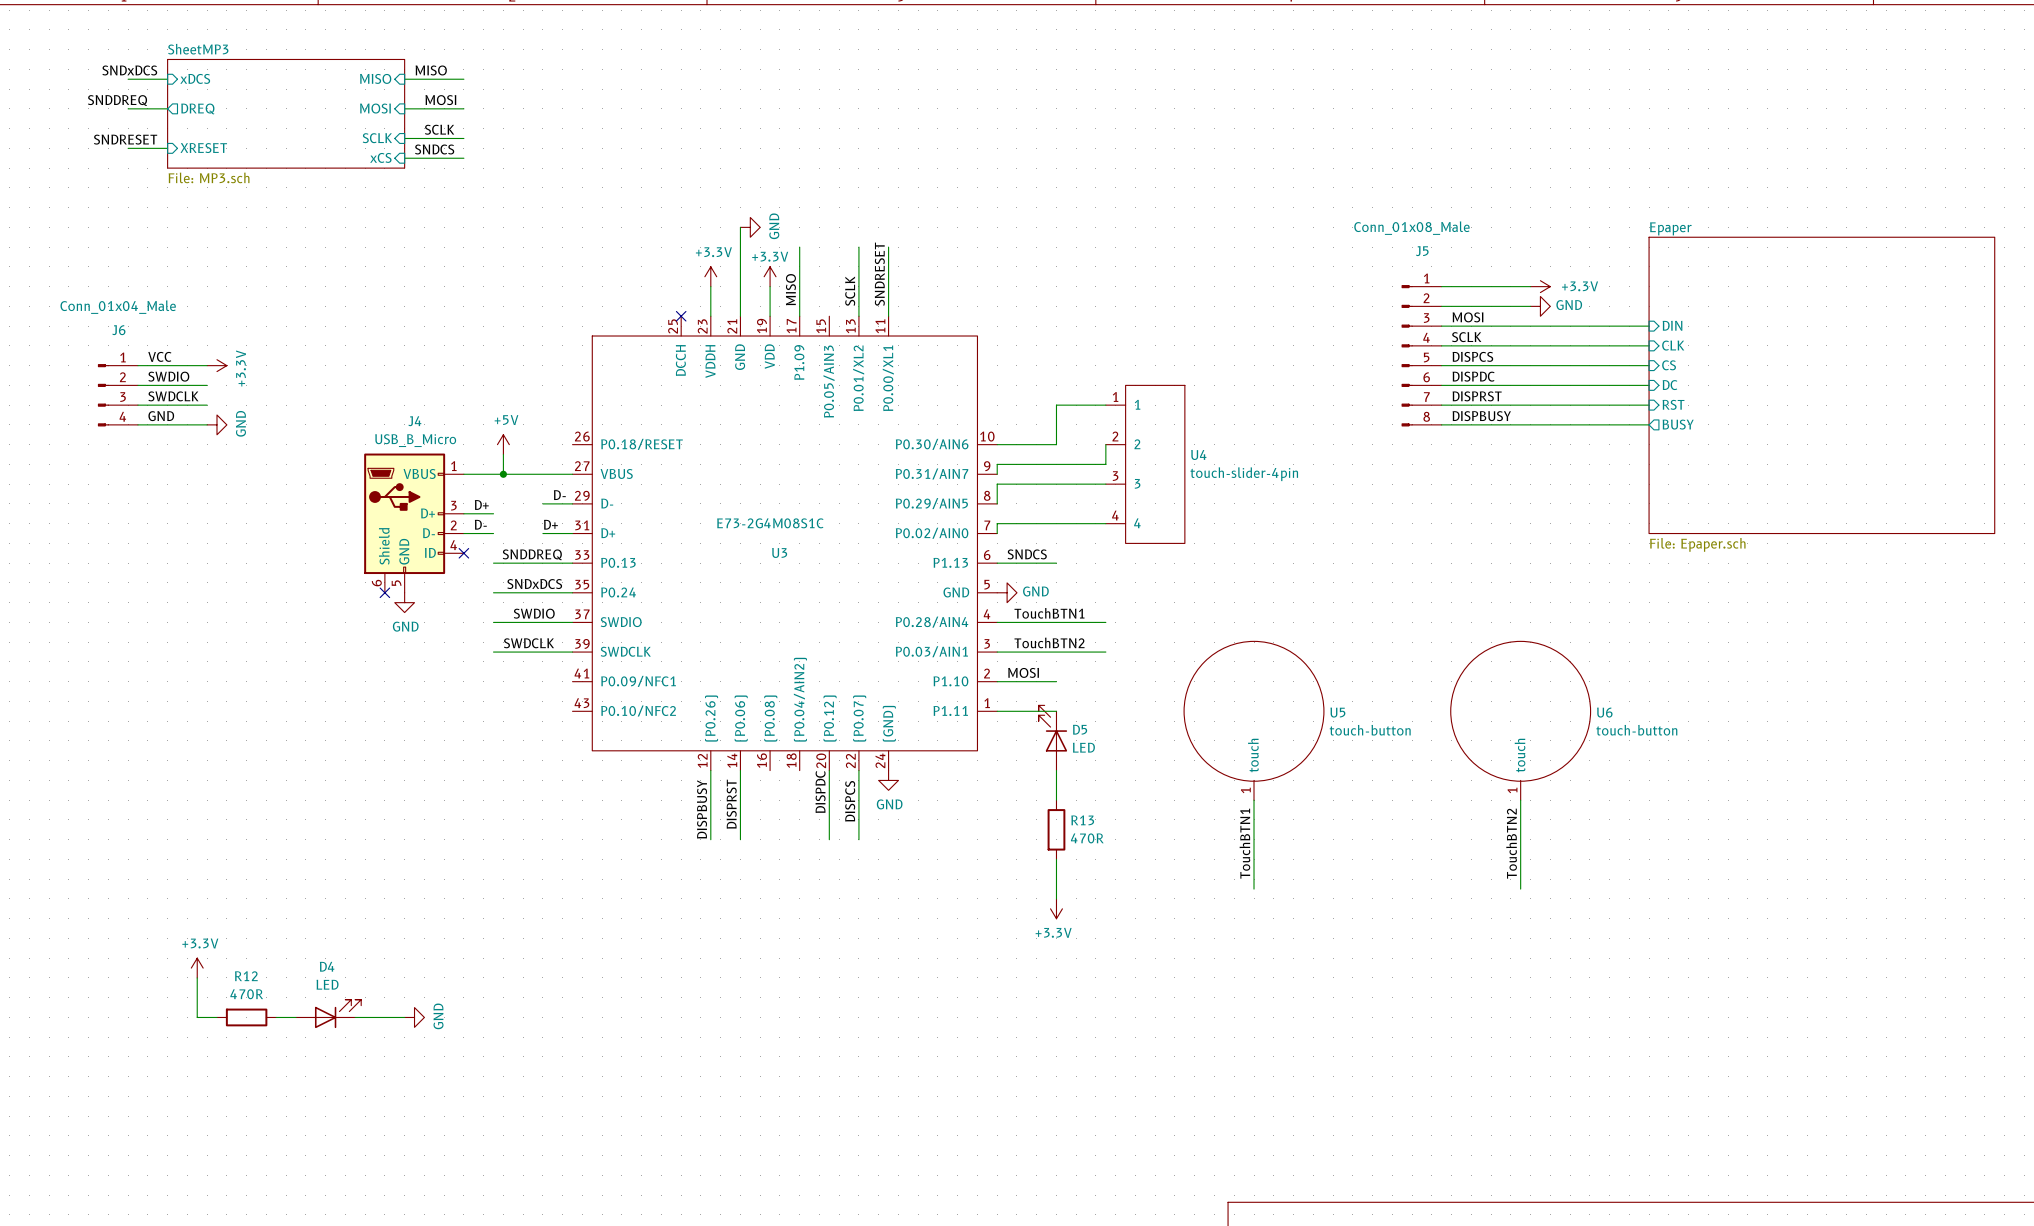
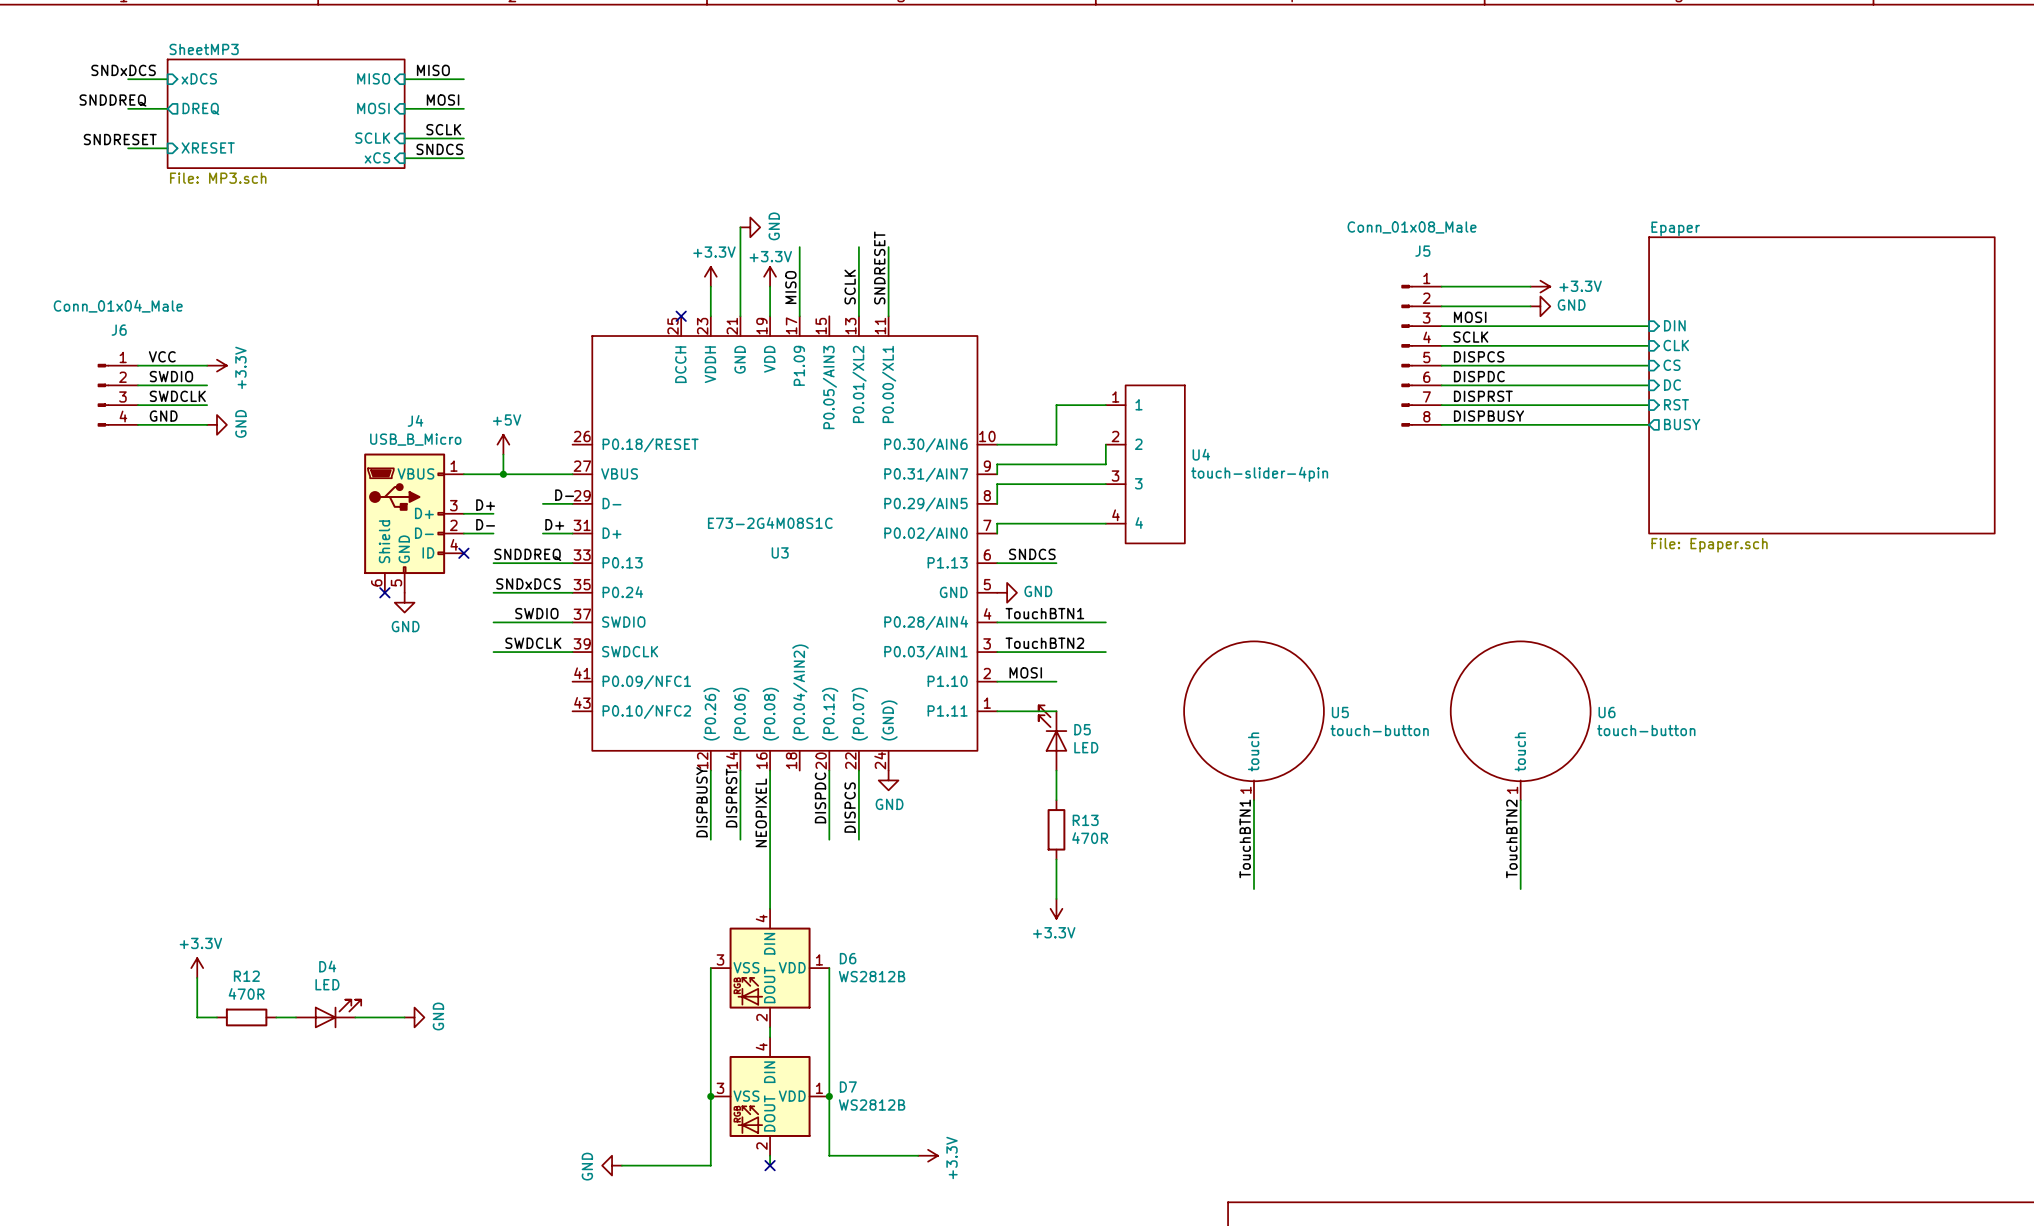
wire: none -> (770, 770) (770, 908)
label: none -> NEOPIXEL (761, 812)
wire: none -> (710, 968) (710, 1165) (621, 1165)
D6: none -> WS2812B (770, 968)
wire: none -> (829, 968) (829, 1155) (918, 1155)
wire: none -> (770, 1027) (770, 1037)
junction: none -> (710, 1096)
D7: none -> WS2812B (770, 1096)
junction: none -> (829, 1096)
wire: none -> (770, 1155) (770, 1165)
power symbol: none -> +3.3V (928, 1155)
power symbol: none -> GND (612, 1165)
no-connect mark: none -> (770, 1165)

